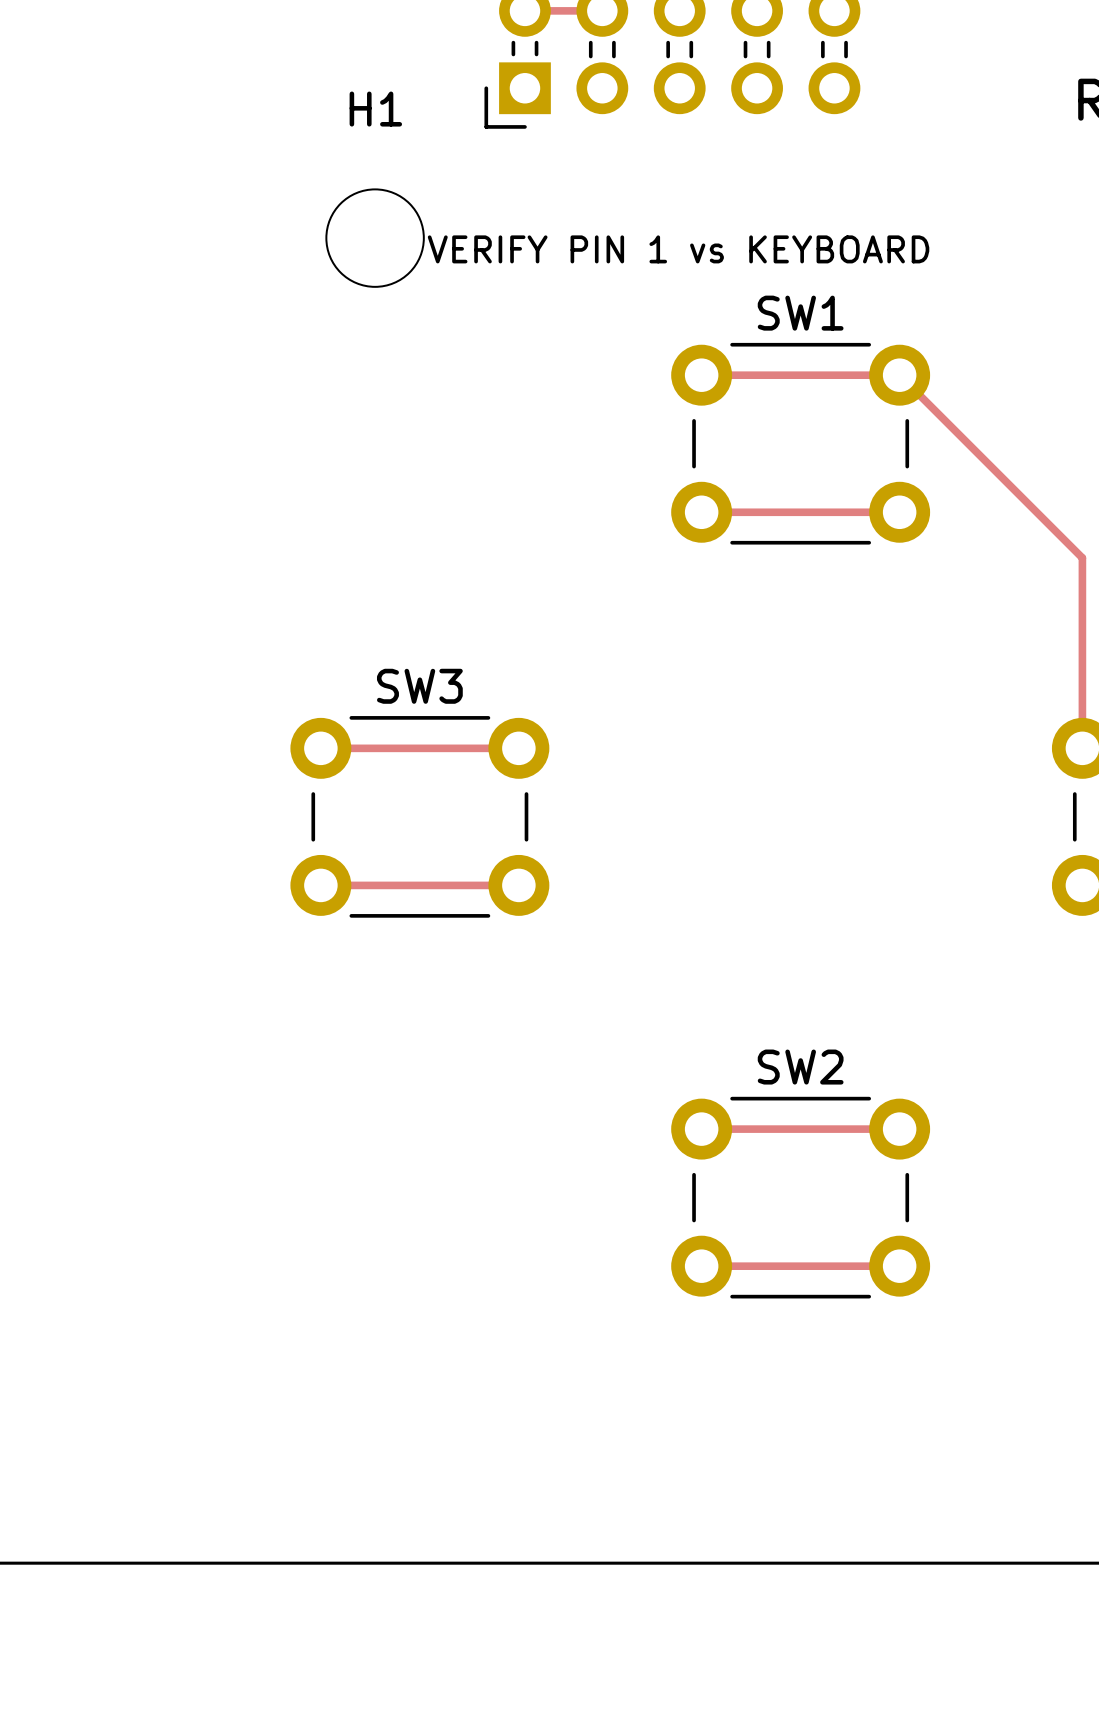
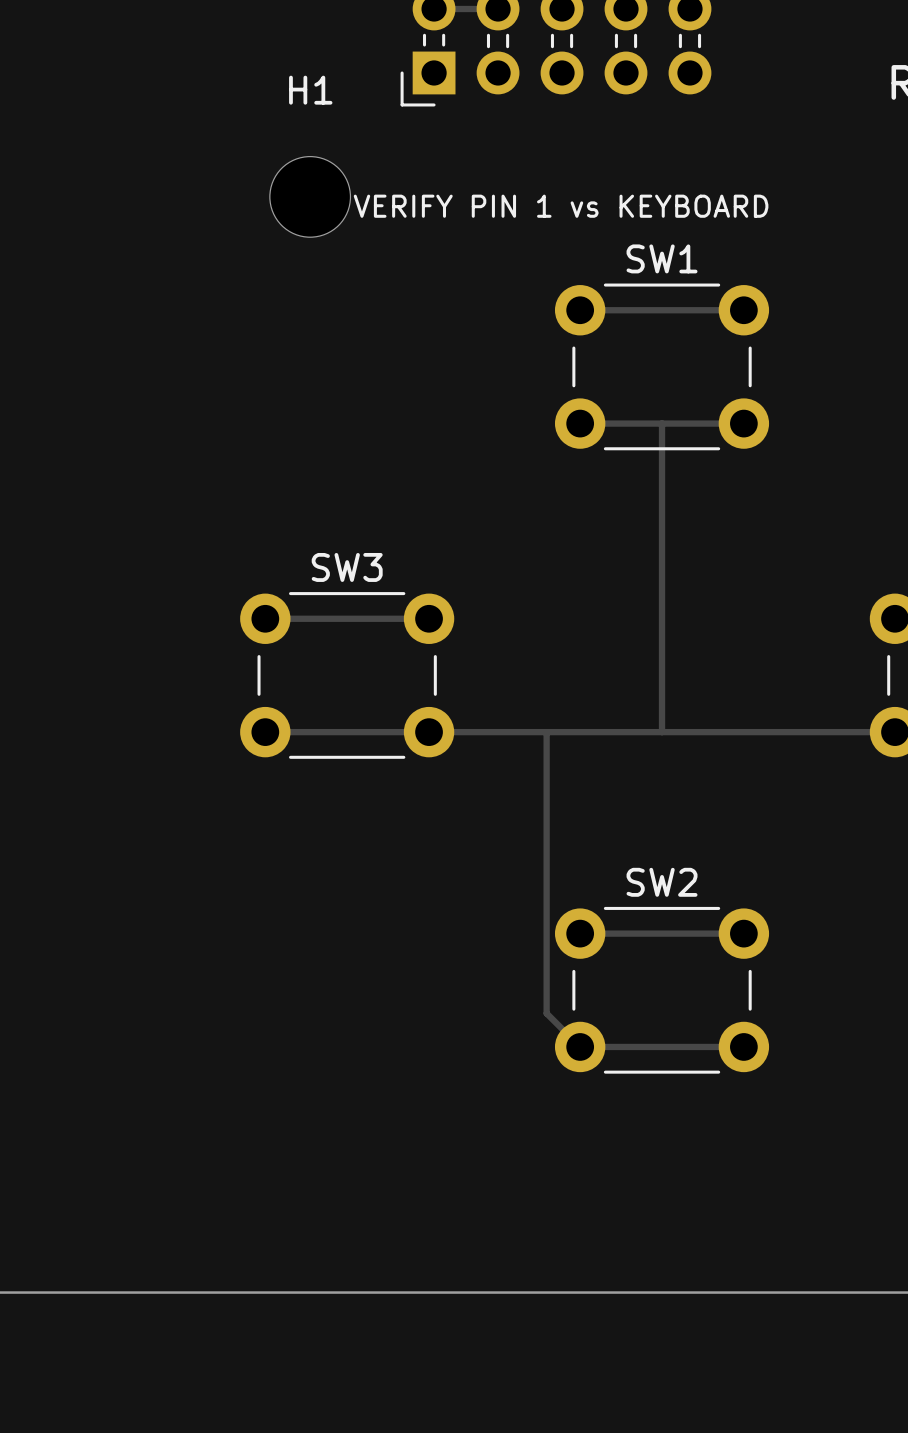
track: (899, 375) (1082, 557) (1082, 748) -> none
track: none -> (662, 423) (662, 732)
track: none -> (429, 732) (895, 732)
track: none -> (546, 732) (546, 1013) (580, 1046)

